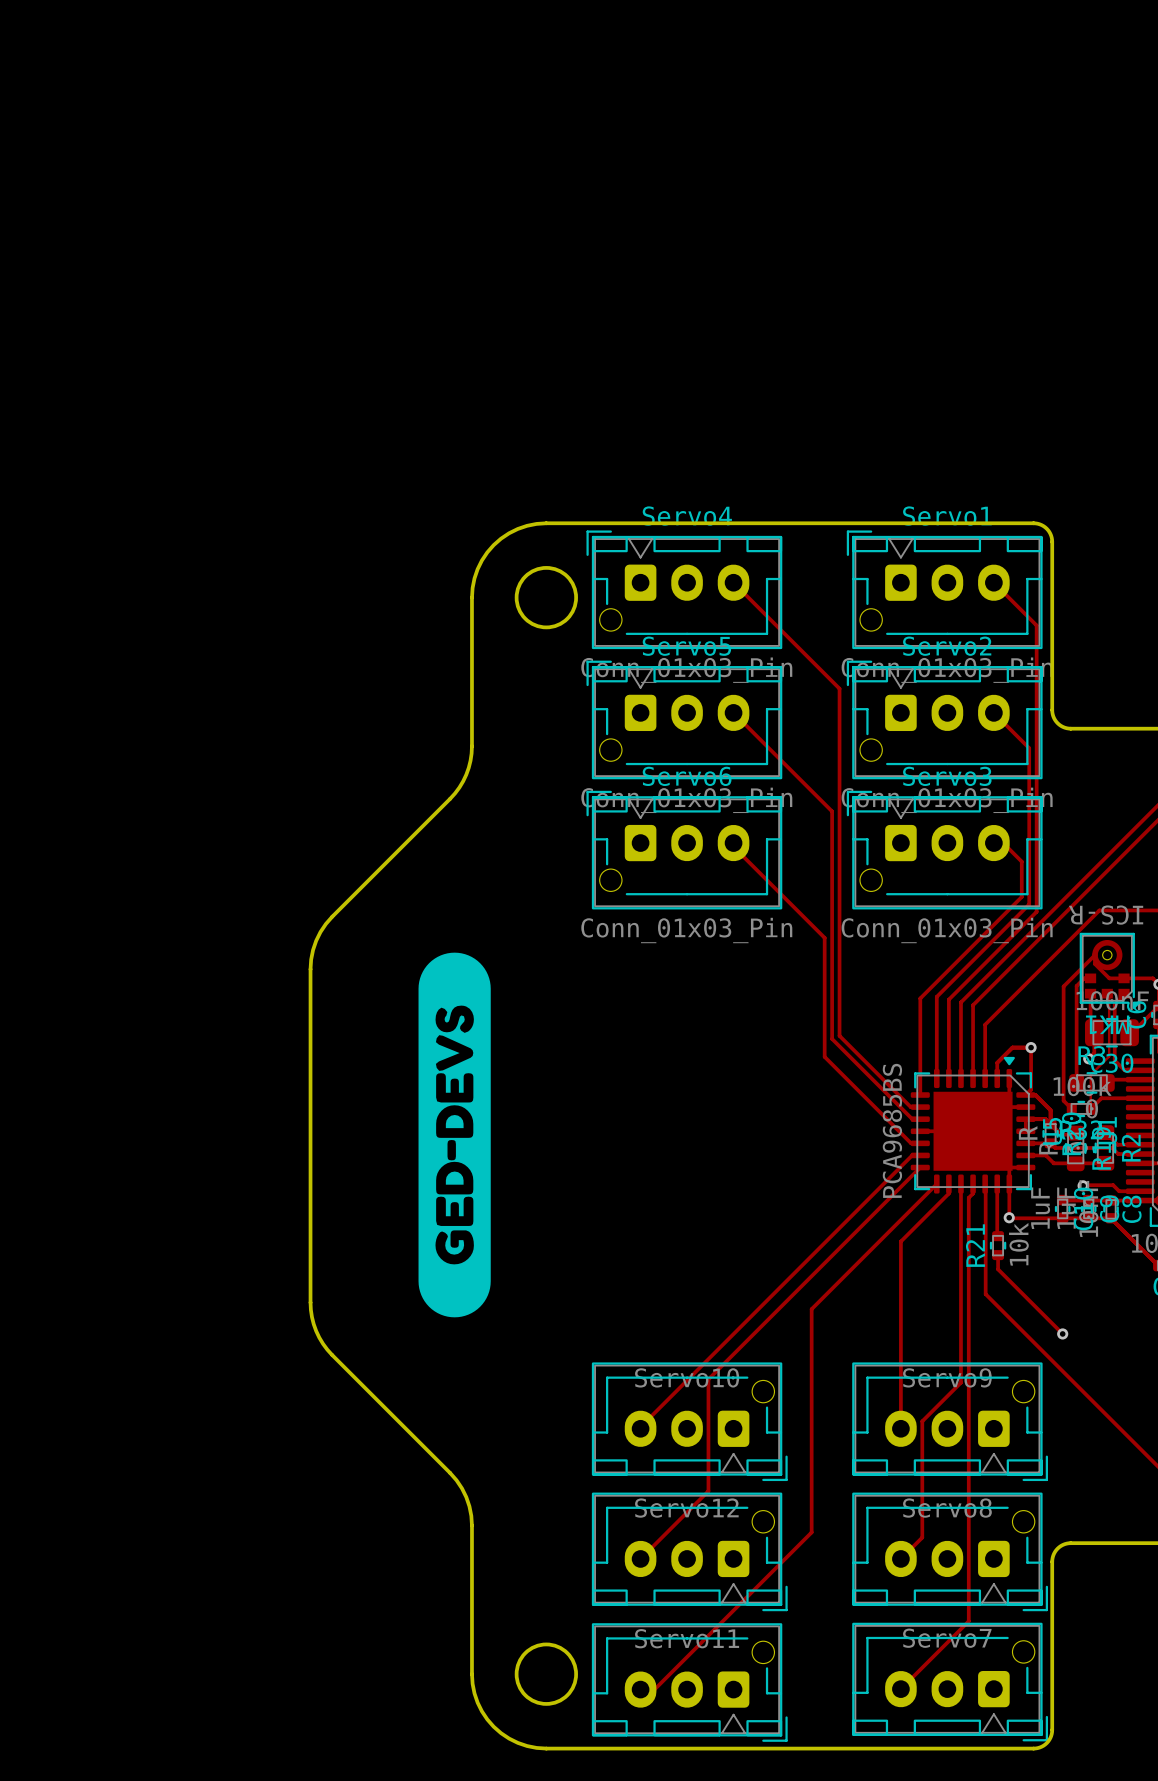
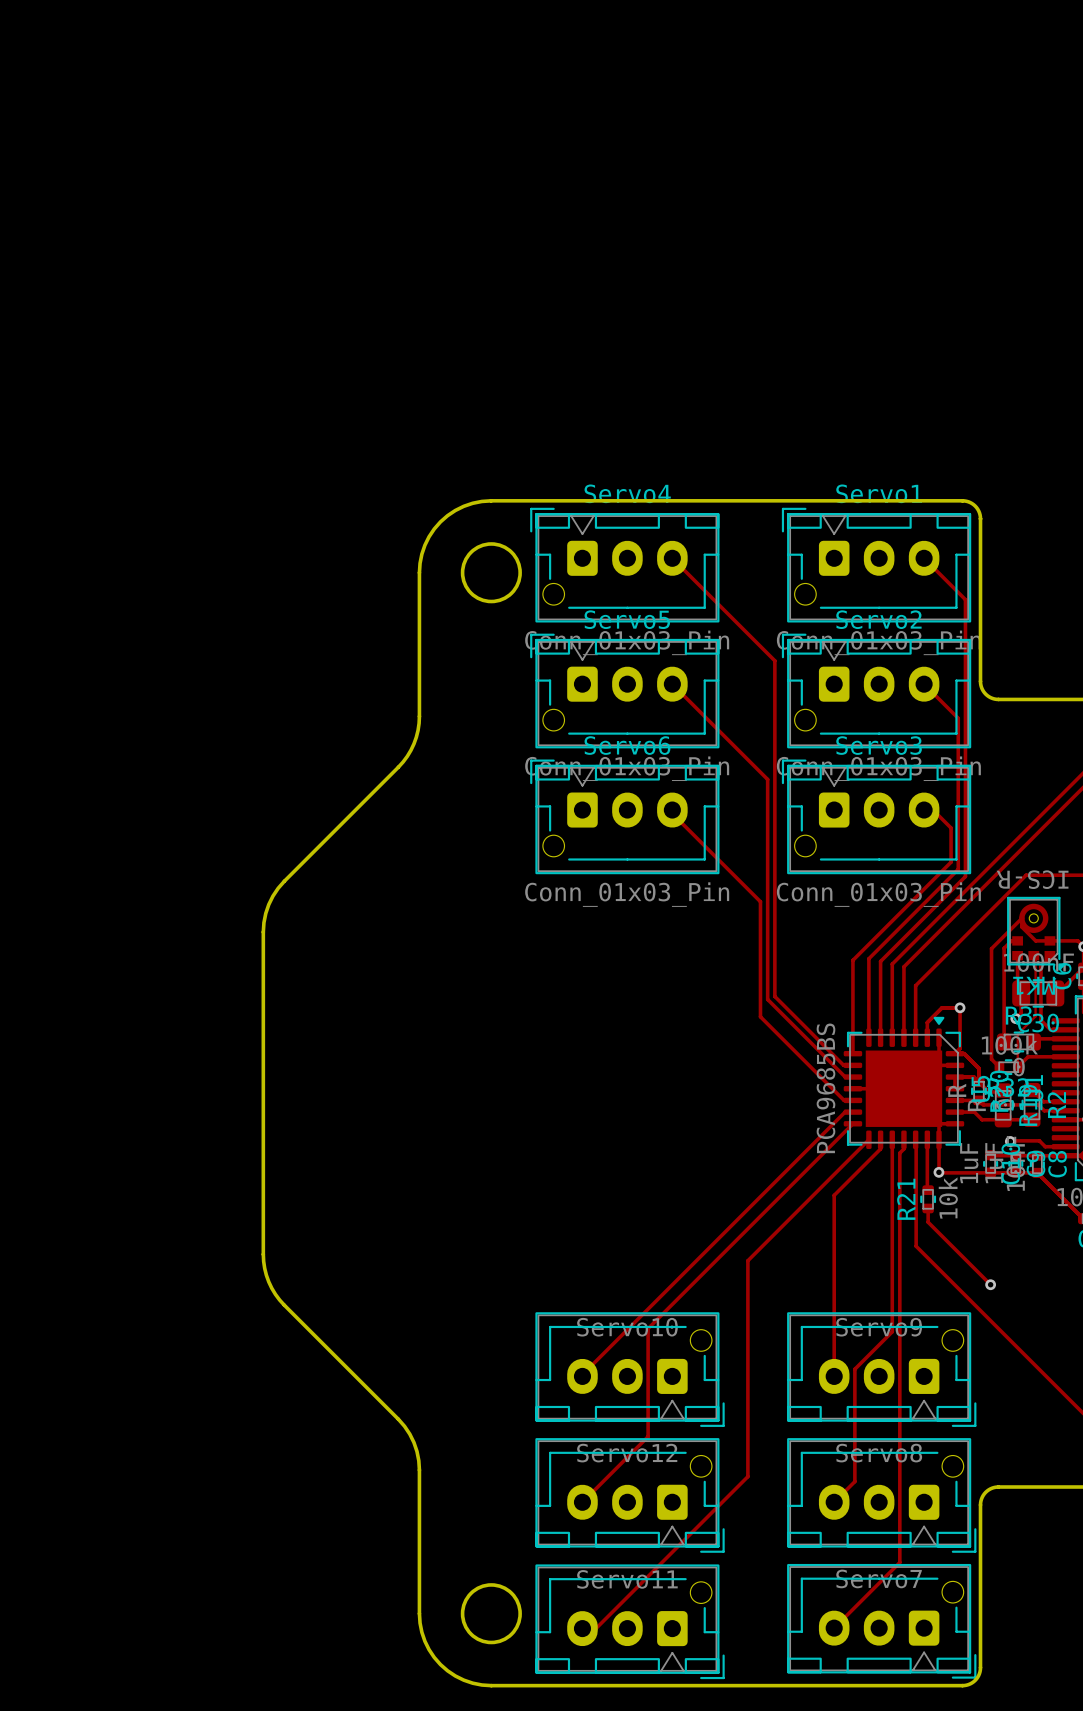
drawing: [418, 952, 491, 1318] -> none

